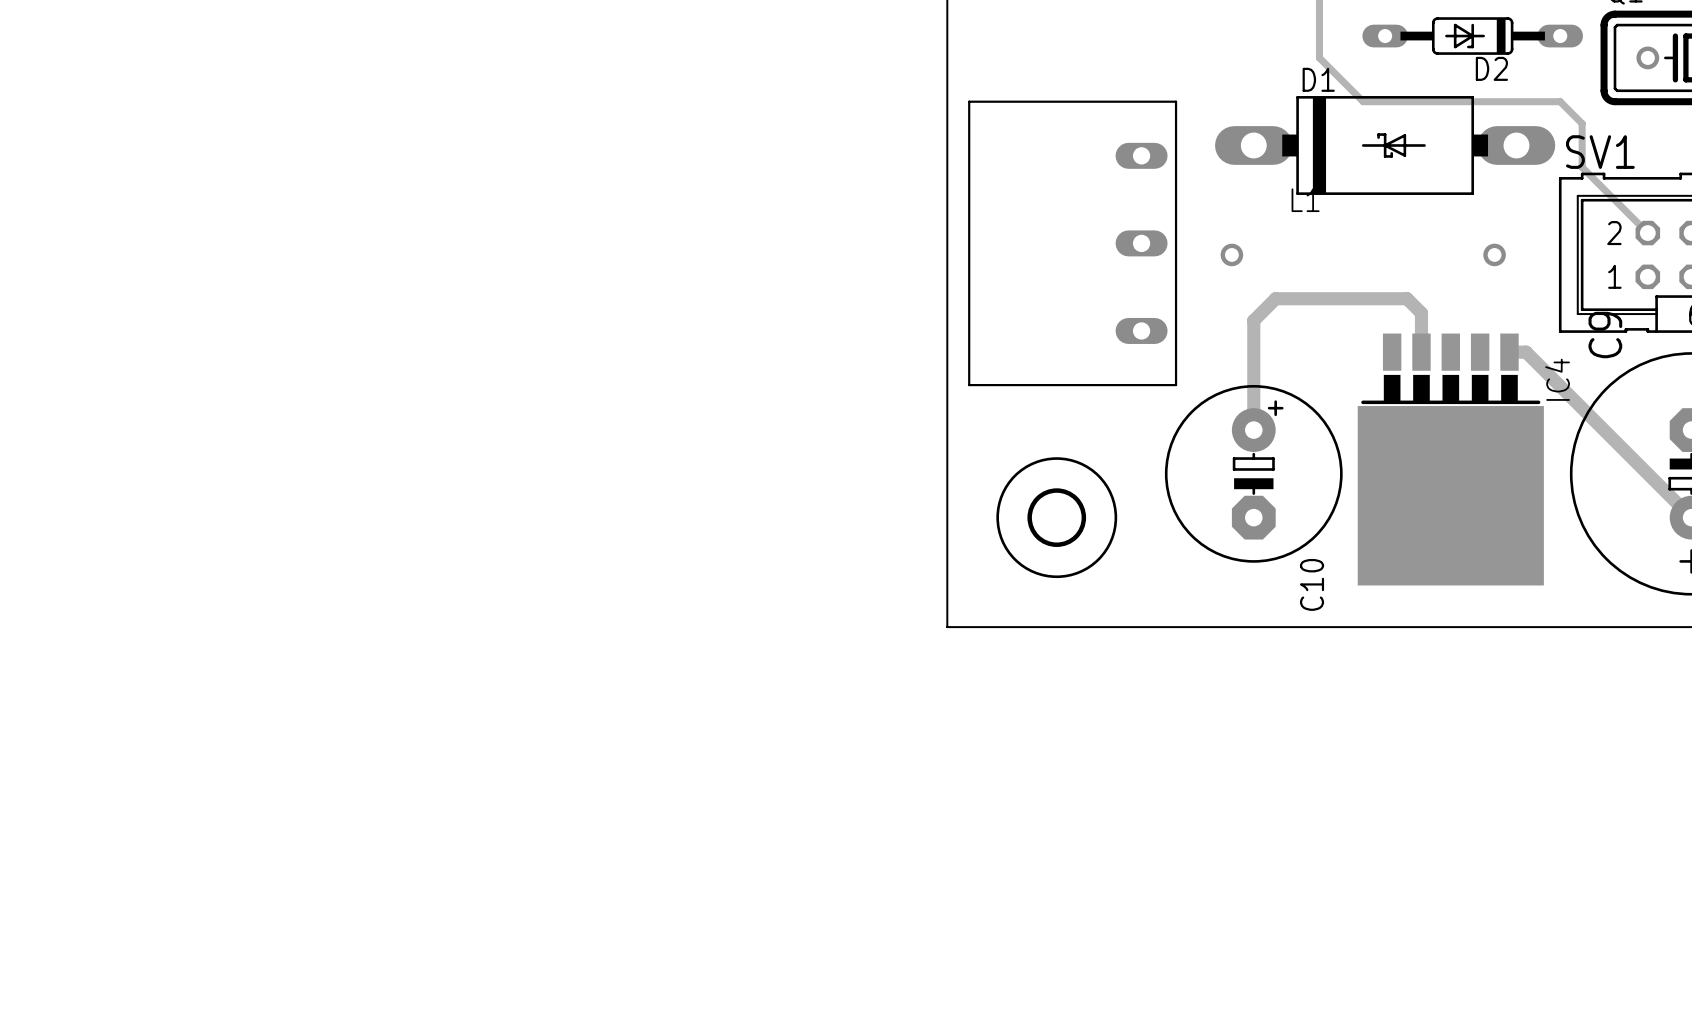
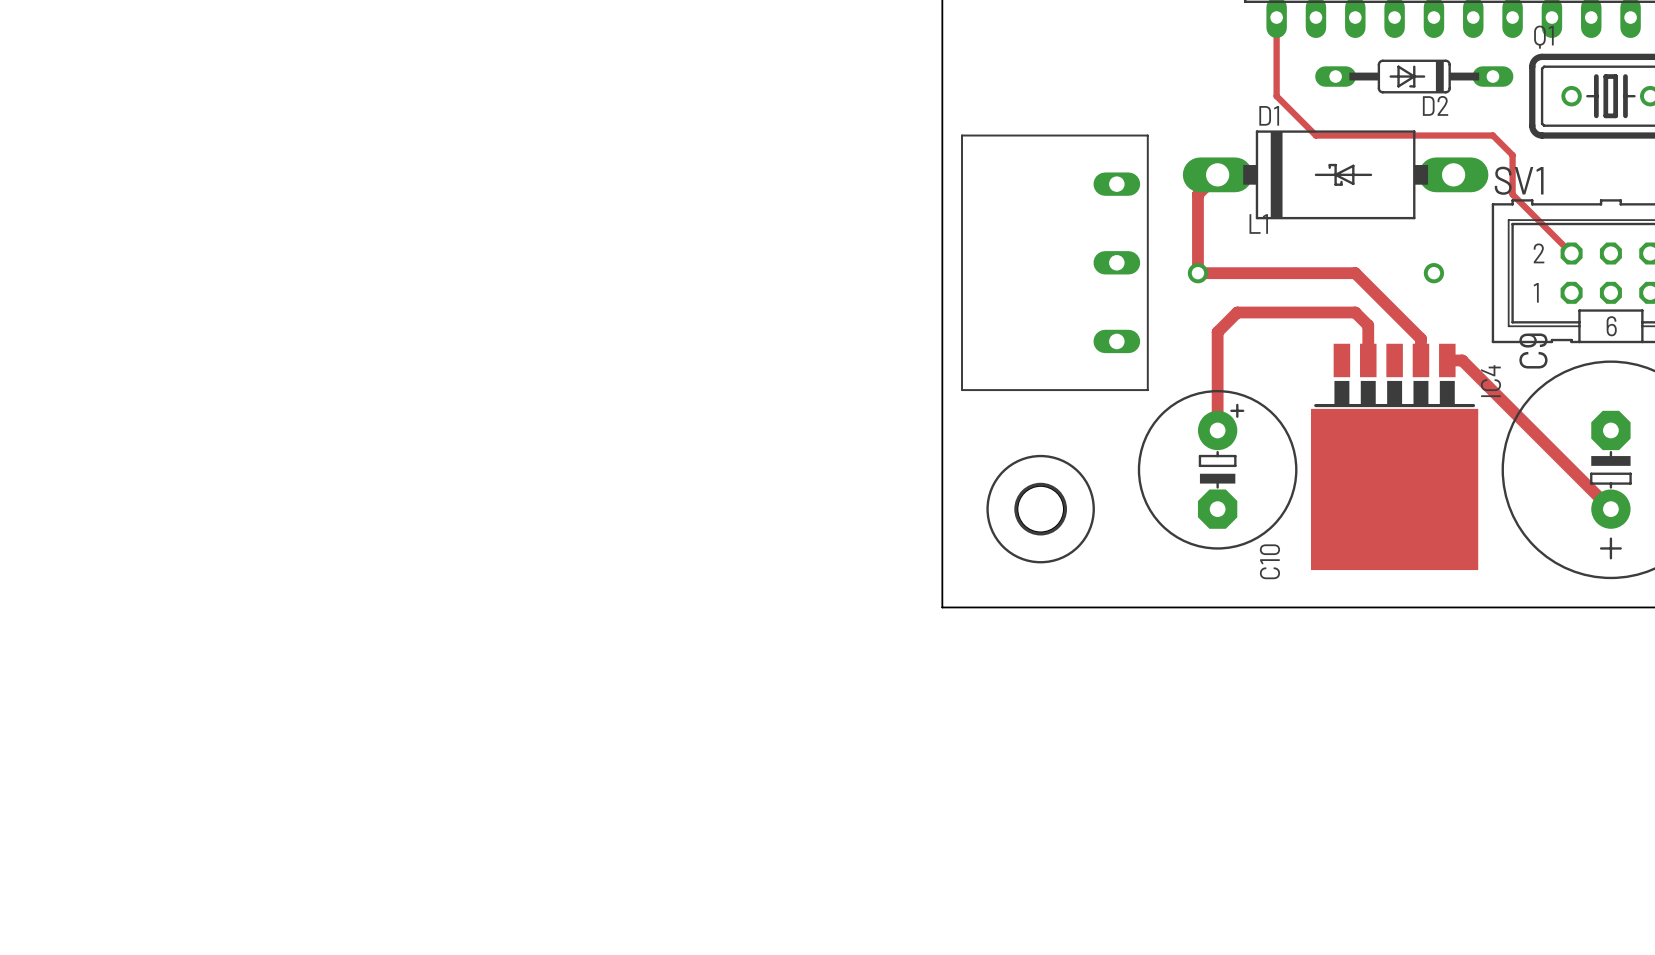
track: none -> (1217, 174) (1197, 194) (1197, 273) (1355, 273) (1420, 338) (1420, 360)

